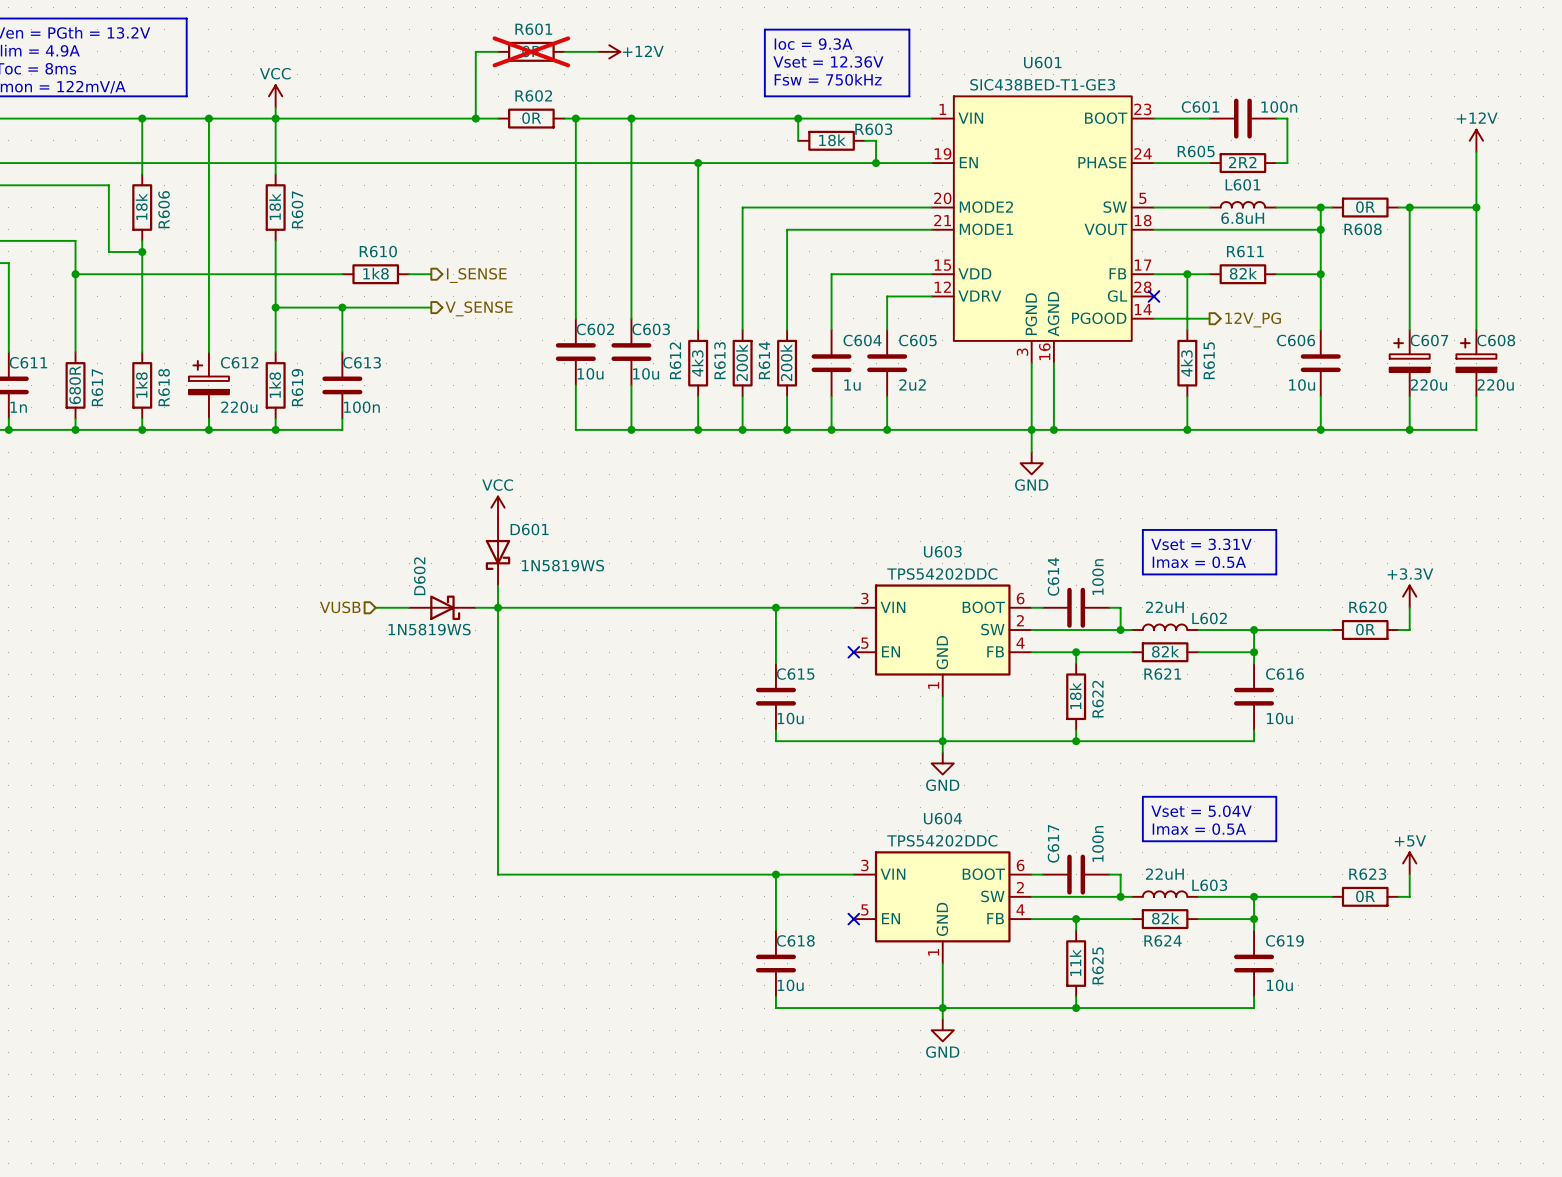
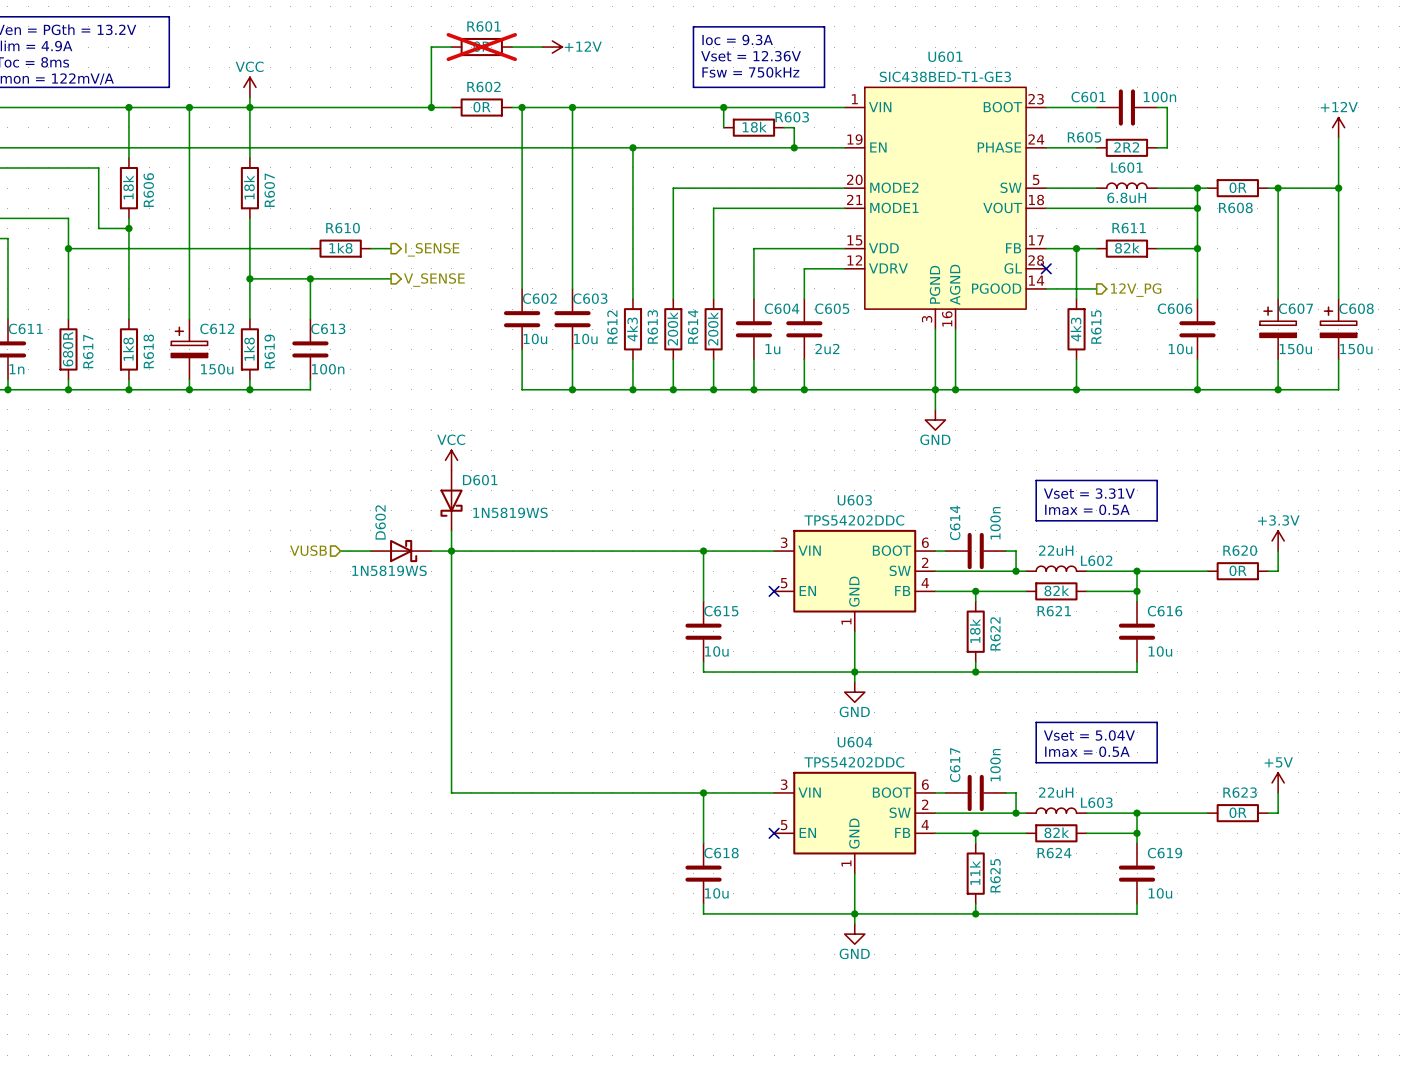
C607 value: 220u (1428, 385) -> 150u (1295, 349)
C608 value: 220u (1495, 385) -> 150u (1356, 349)
C612 value: 220u (239, 407) -> 150u (217, 369)

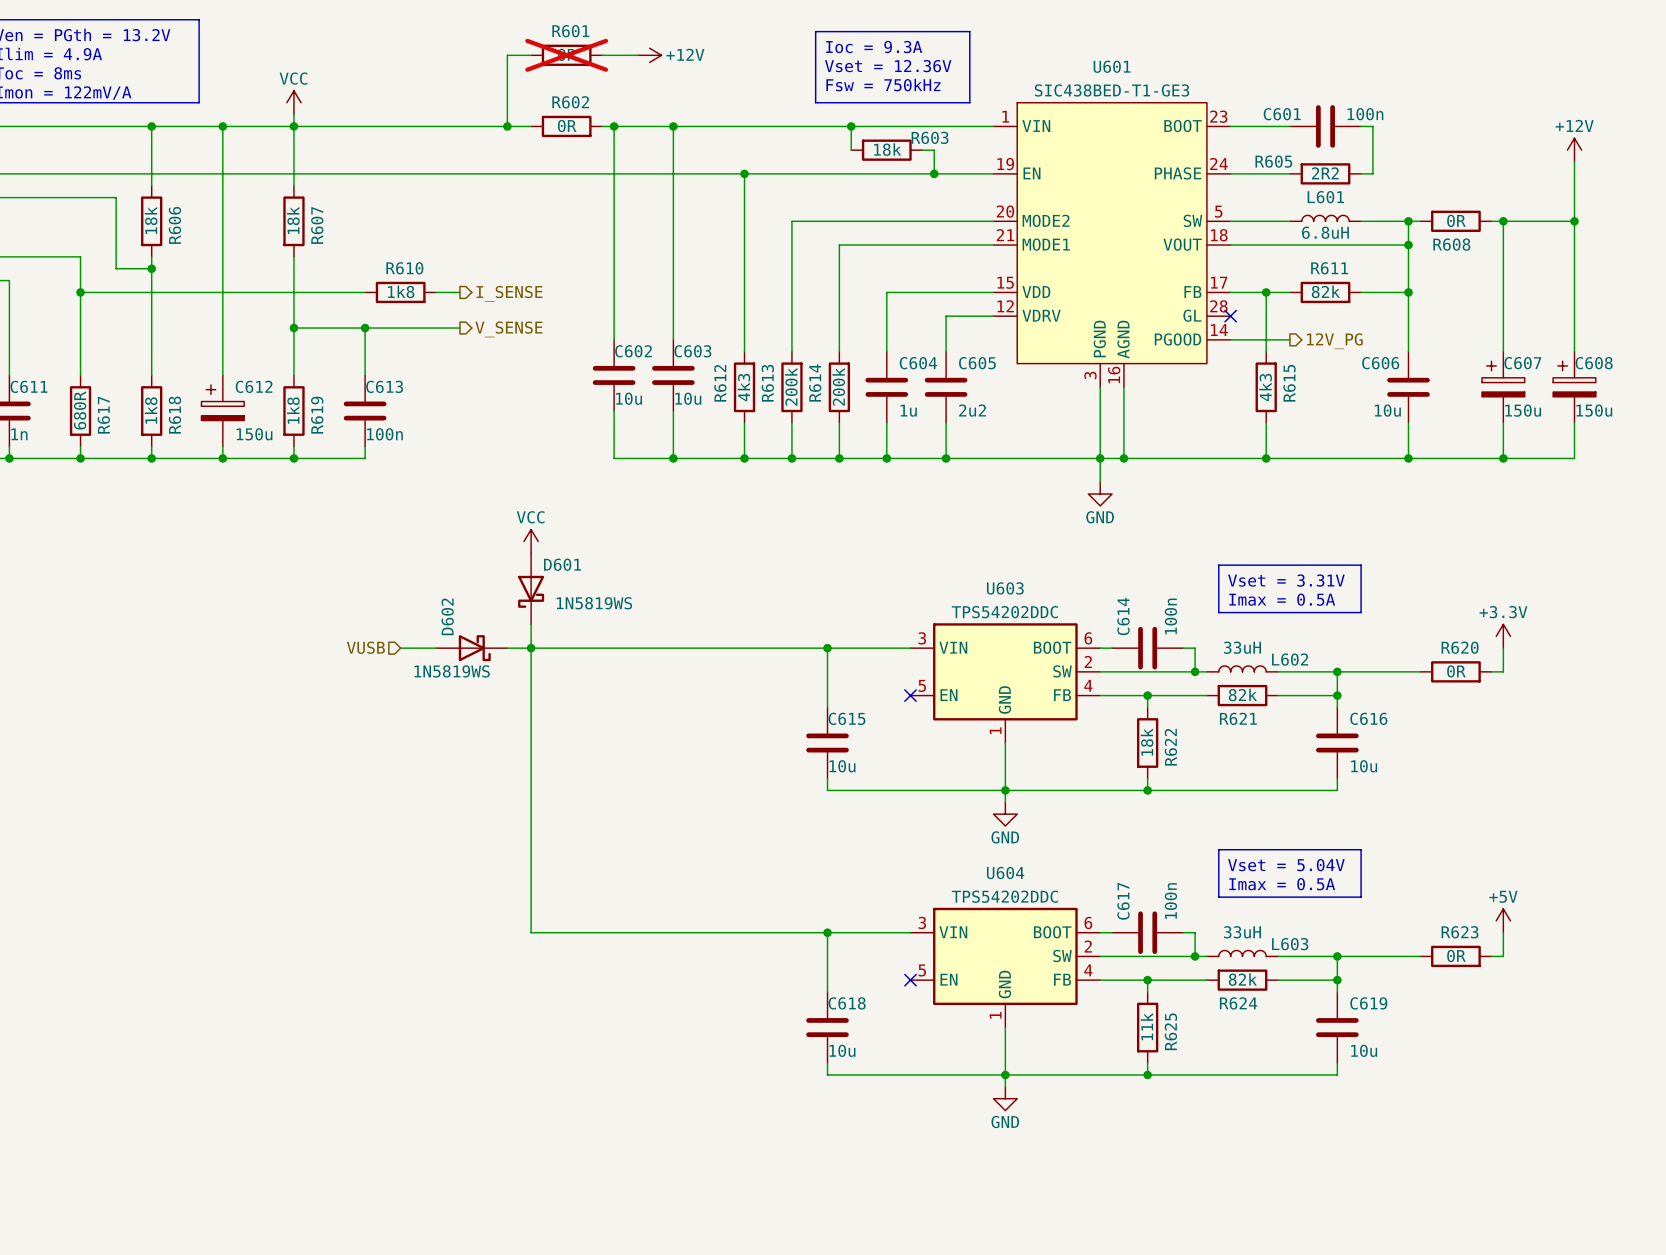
L602 value: 22uH (1056, 550) -> 33uH (1242, 647)
L603 value: 22uH (1056, 792) -> 33uH (1242, 932)

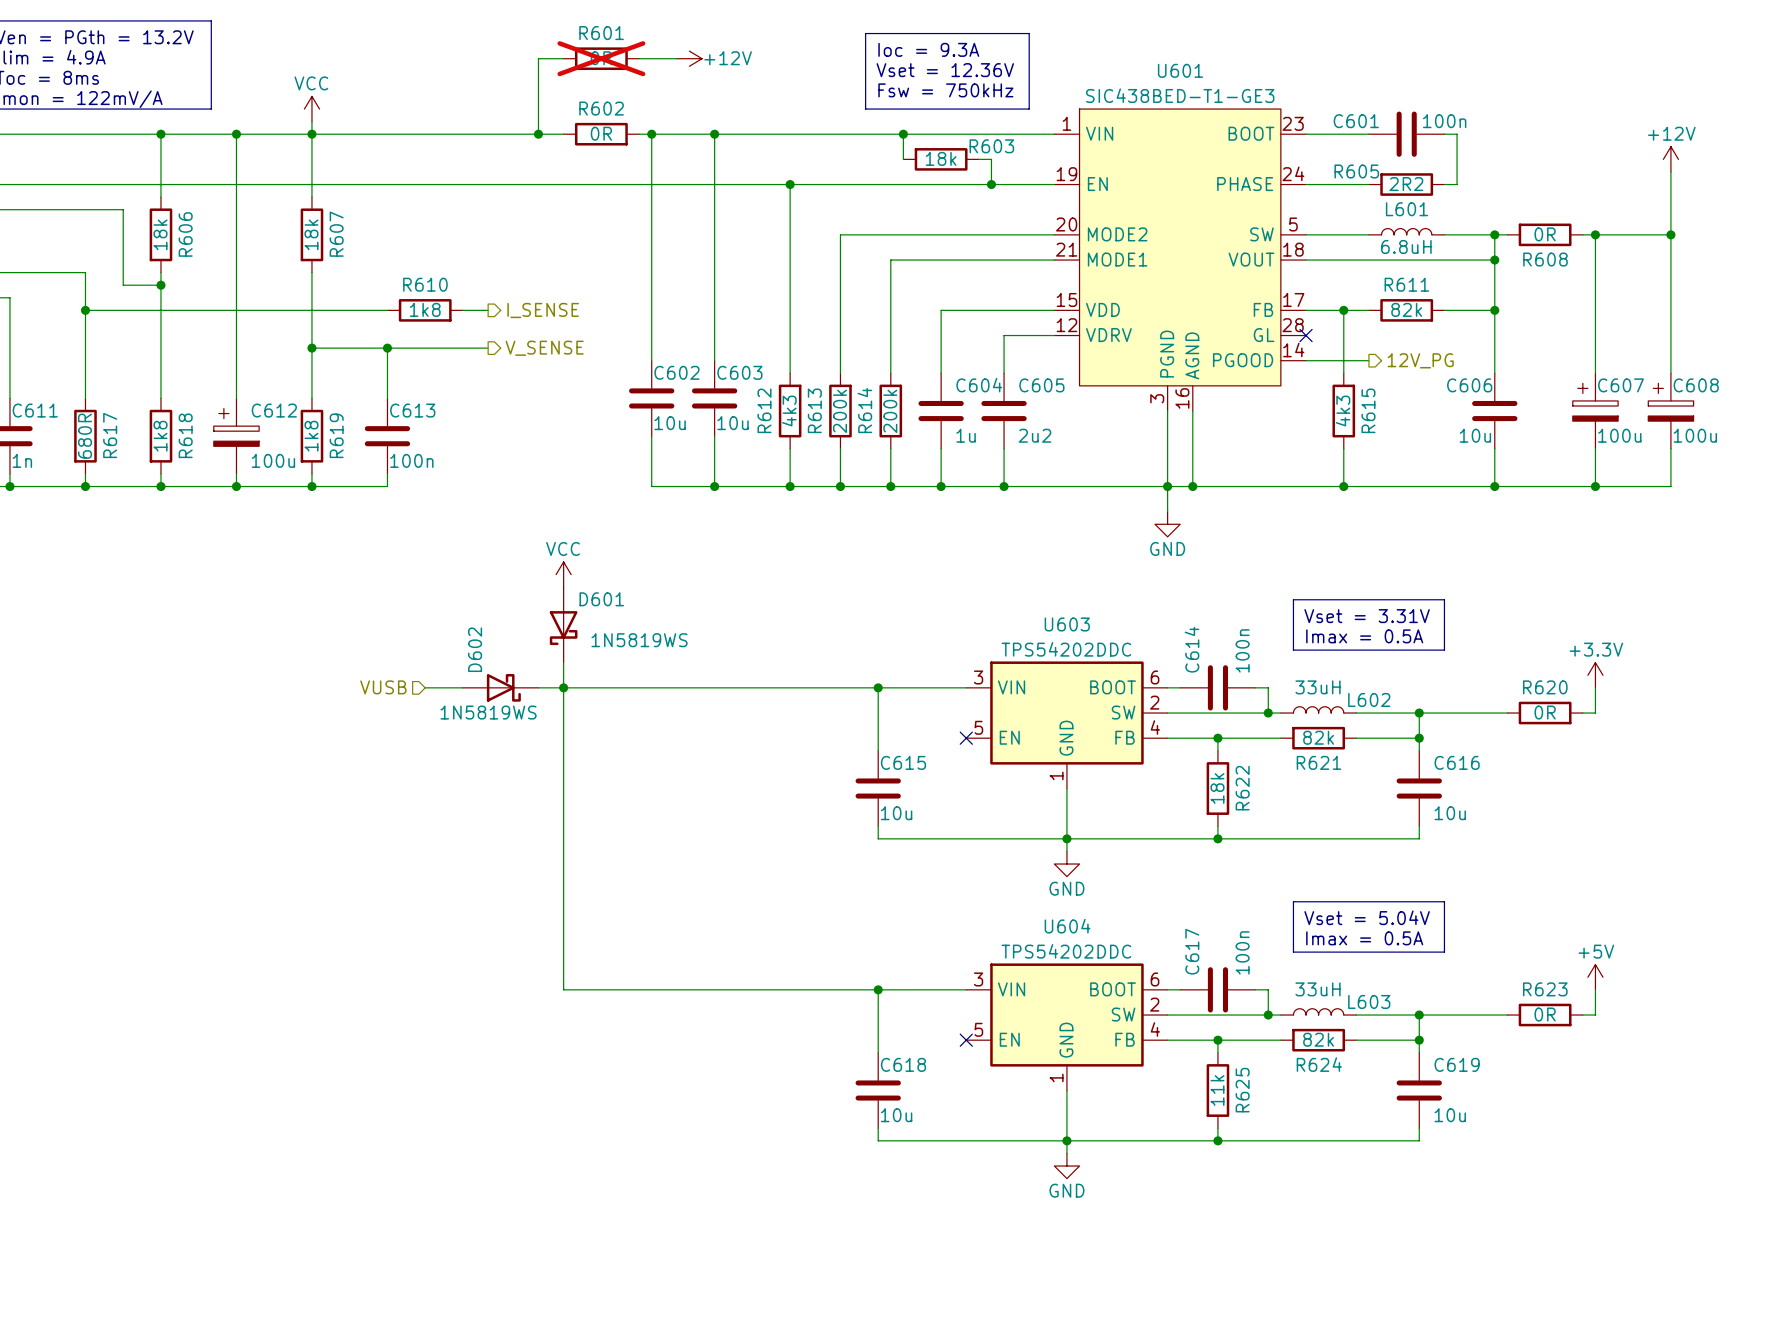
C607 value: 150u (1523, 410) -> 100u (1619, 435)
C608 value: 150u (1594, 410) -> 100u (1695, 435)
C612 value: 150u (254, 434) -> 100u (273, 460)

